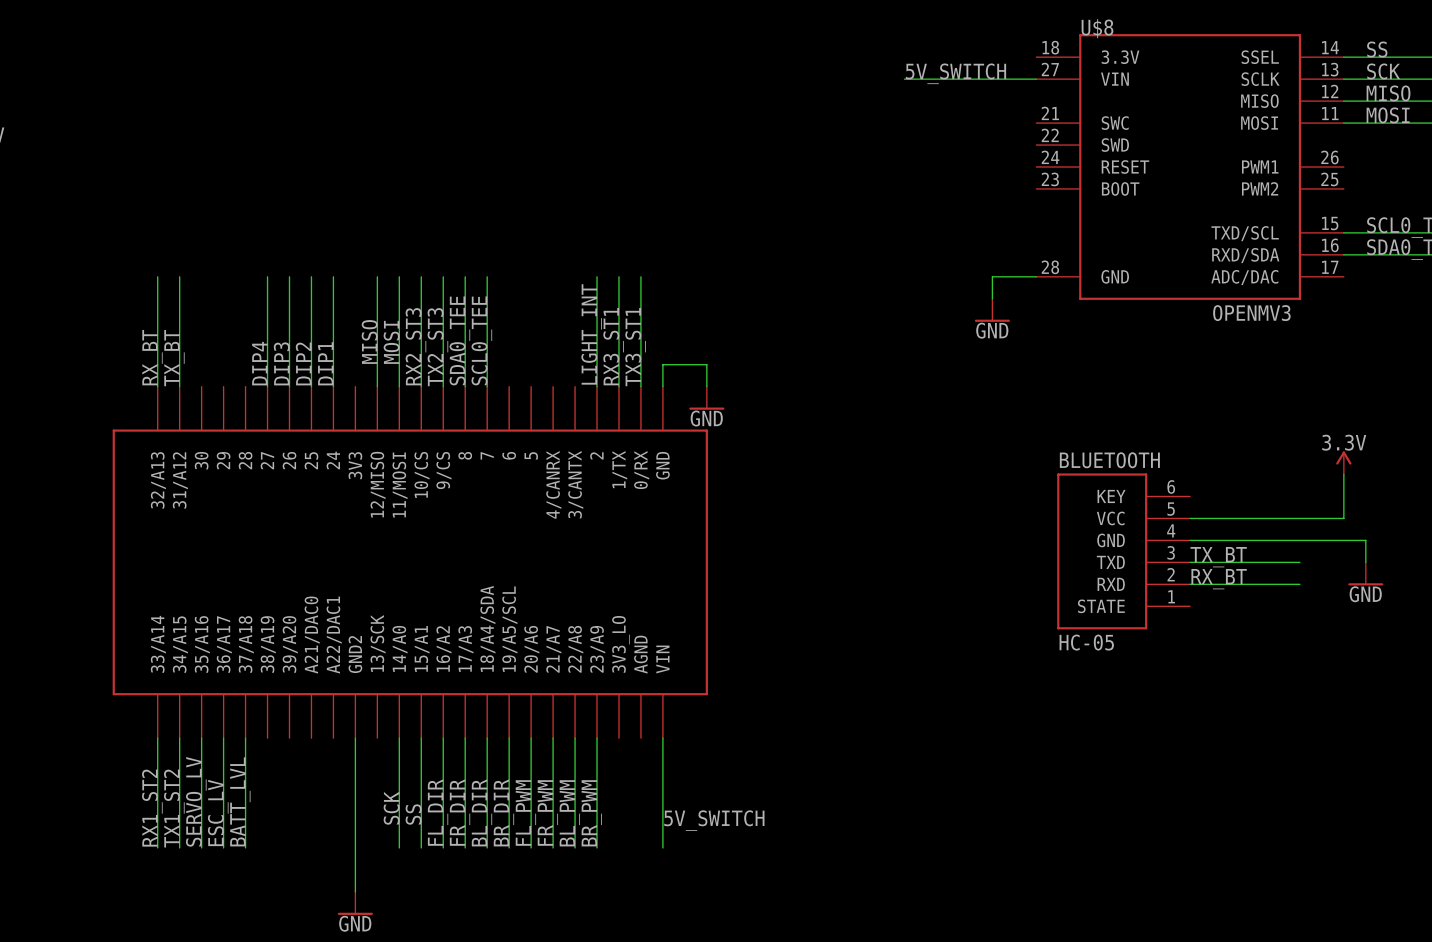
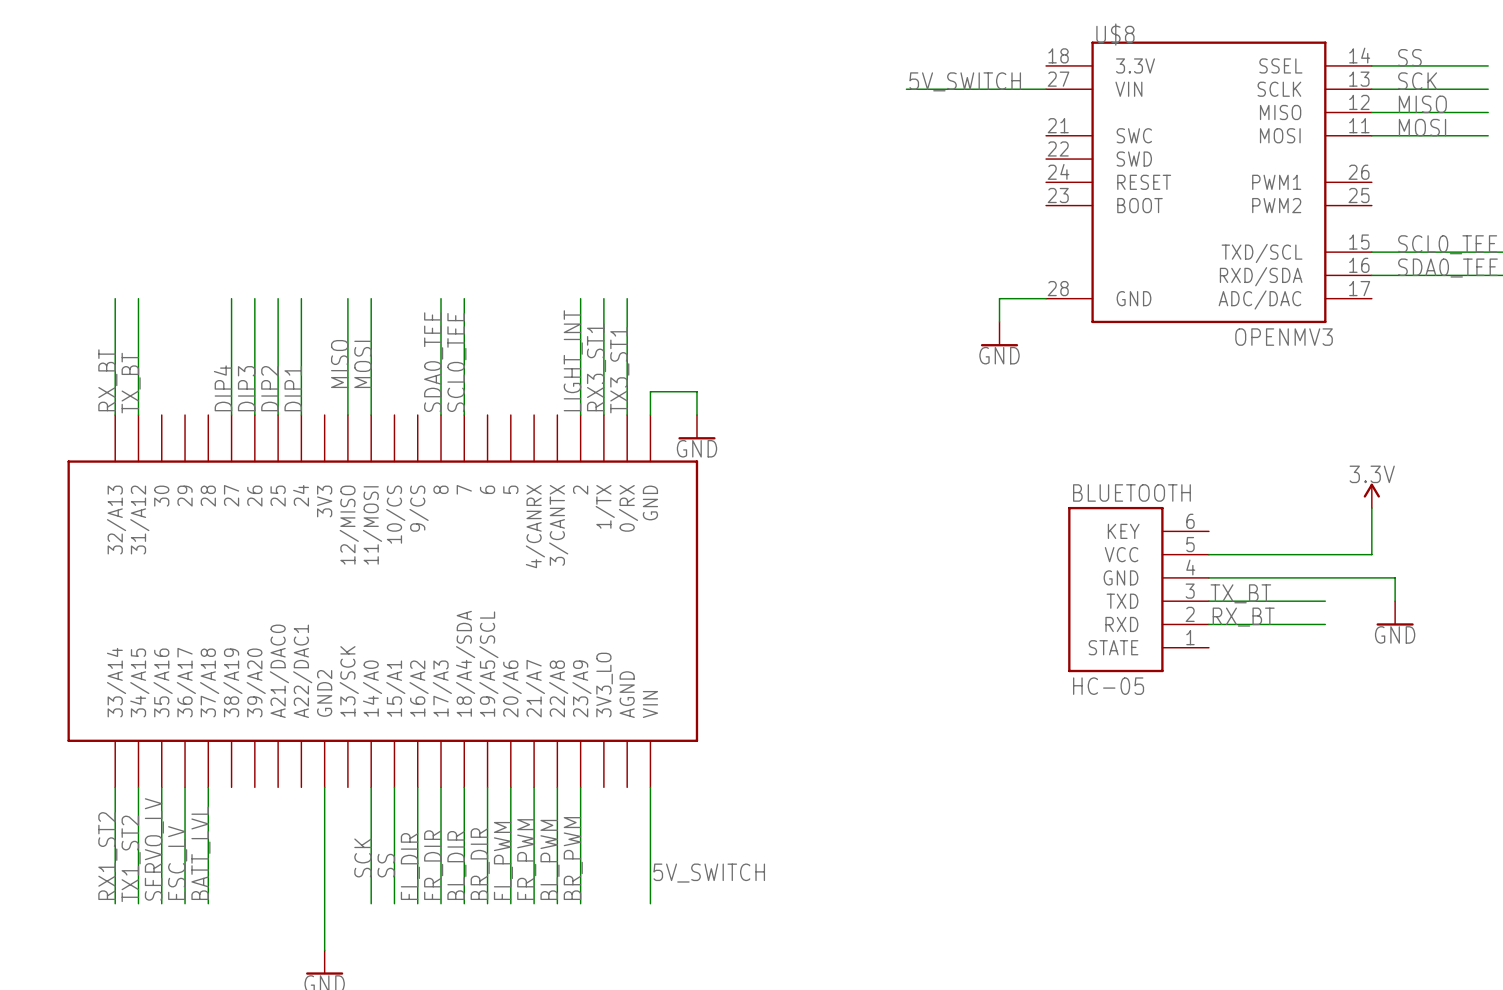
wire: (421, 276) (421, 386) -> none
wire: (443, 276) (443, 386) -> none
label: RX2_ST3 (415, 346) -> none
label: TX2_ST3 (437, 347) -> none

